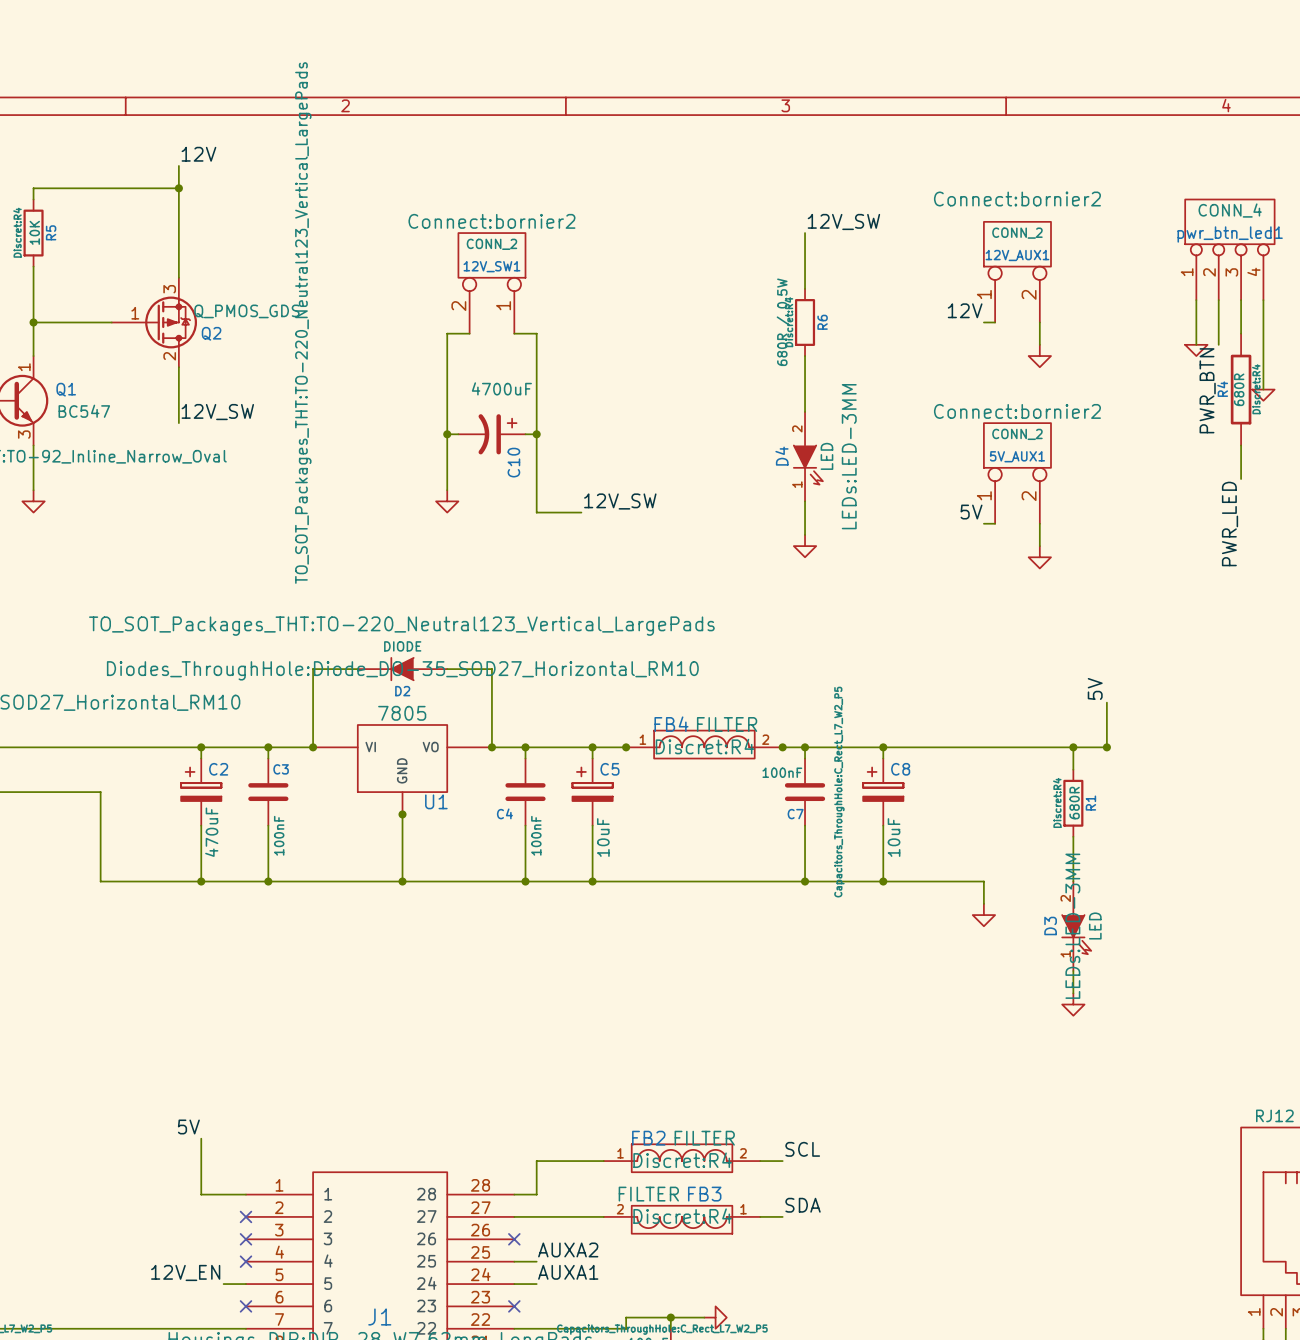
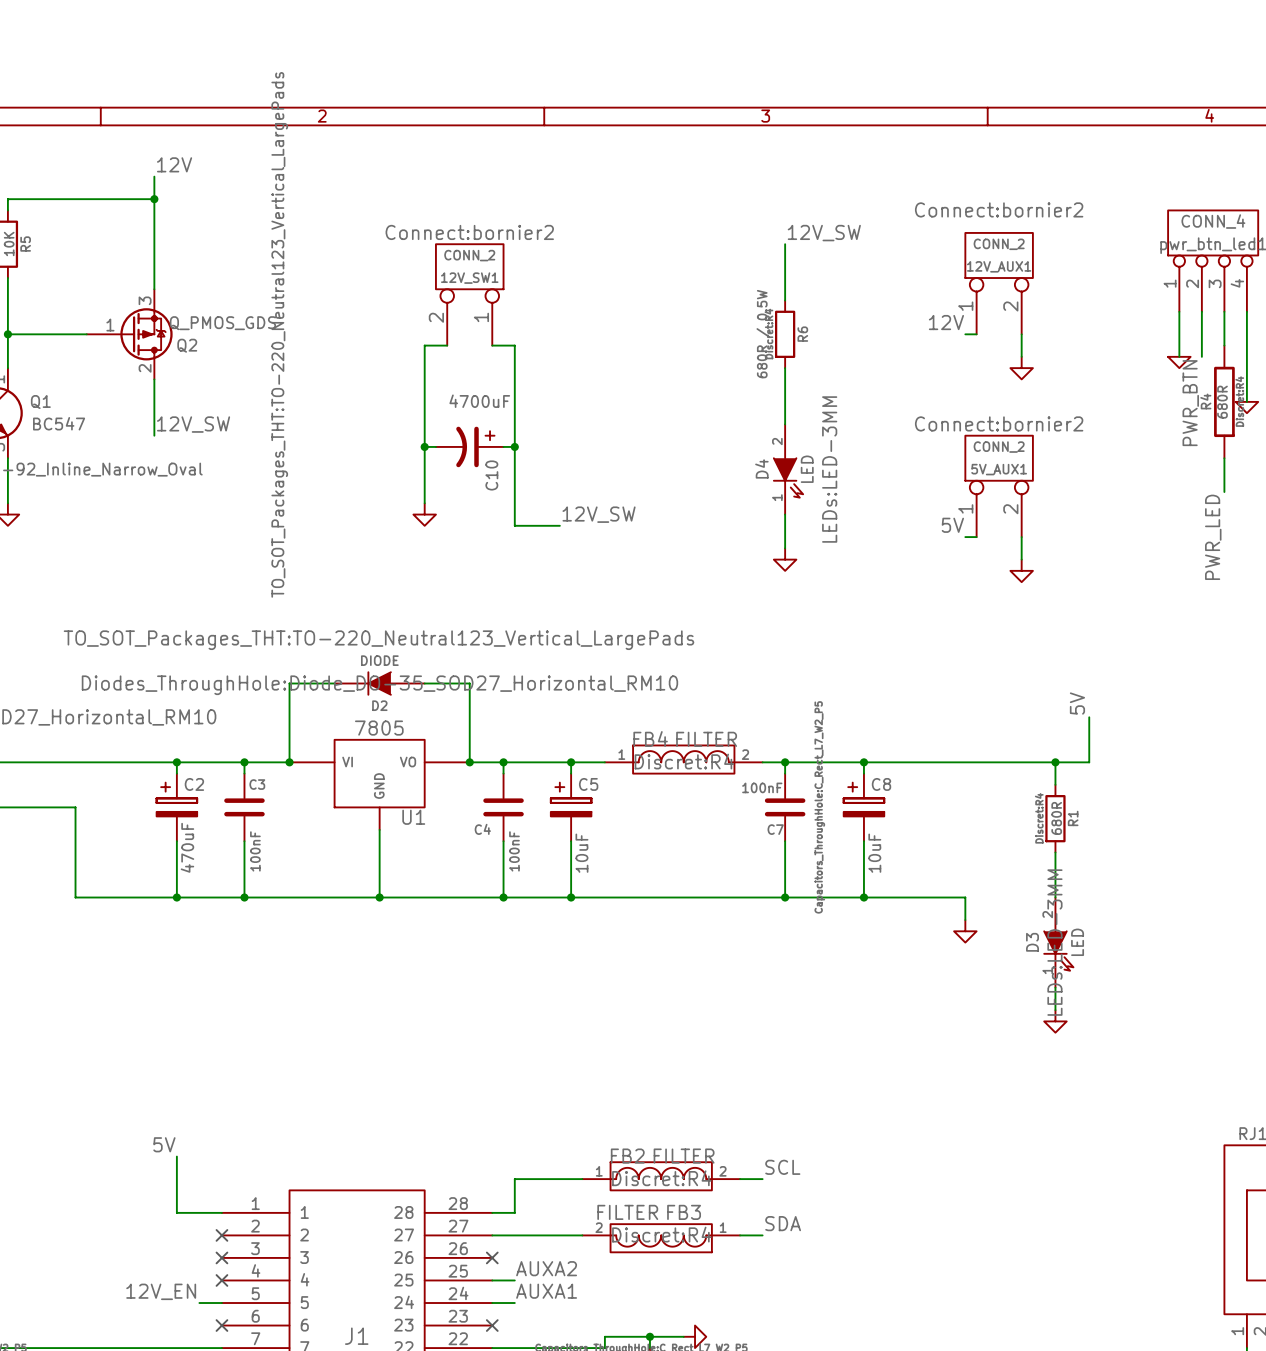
junction: (626, 747) -> none
junction: (782, 747) -> none
junction: (1106, 747) -> none
junction: (402, 814) -> none

